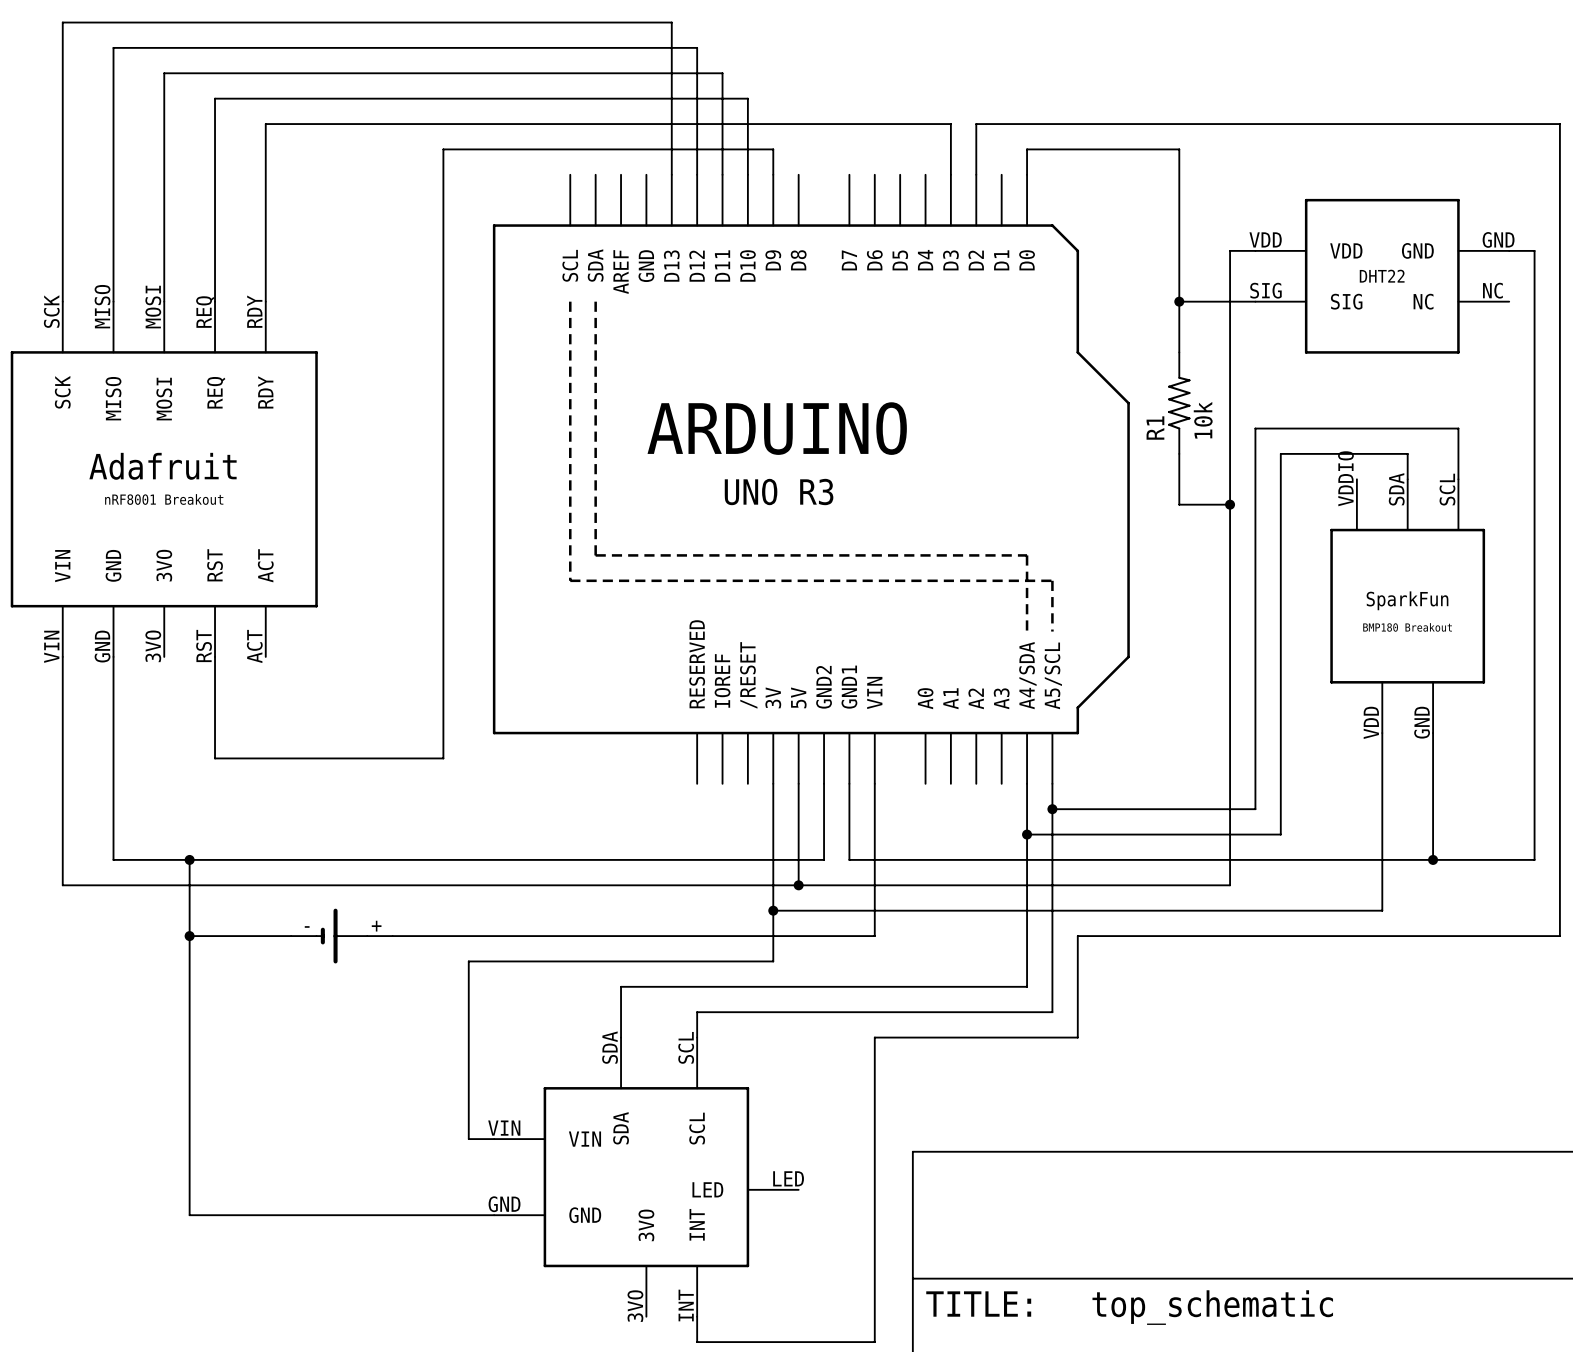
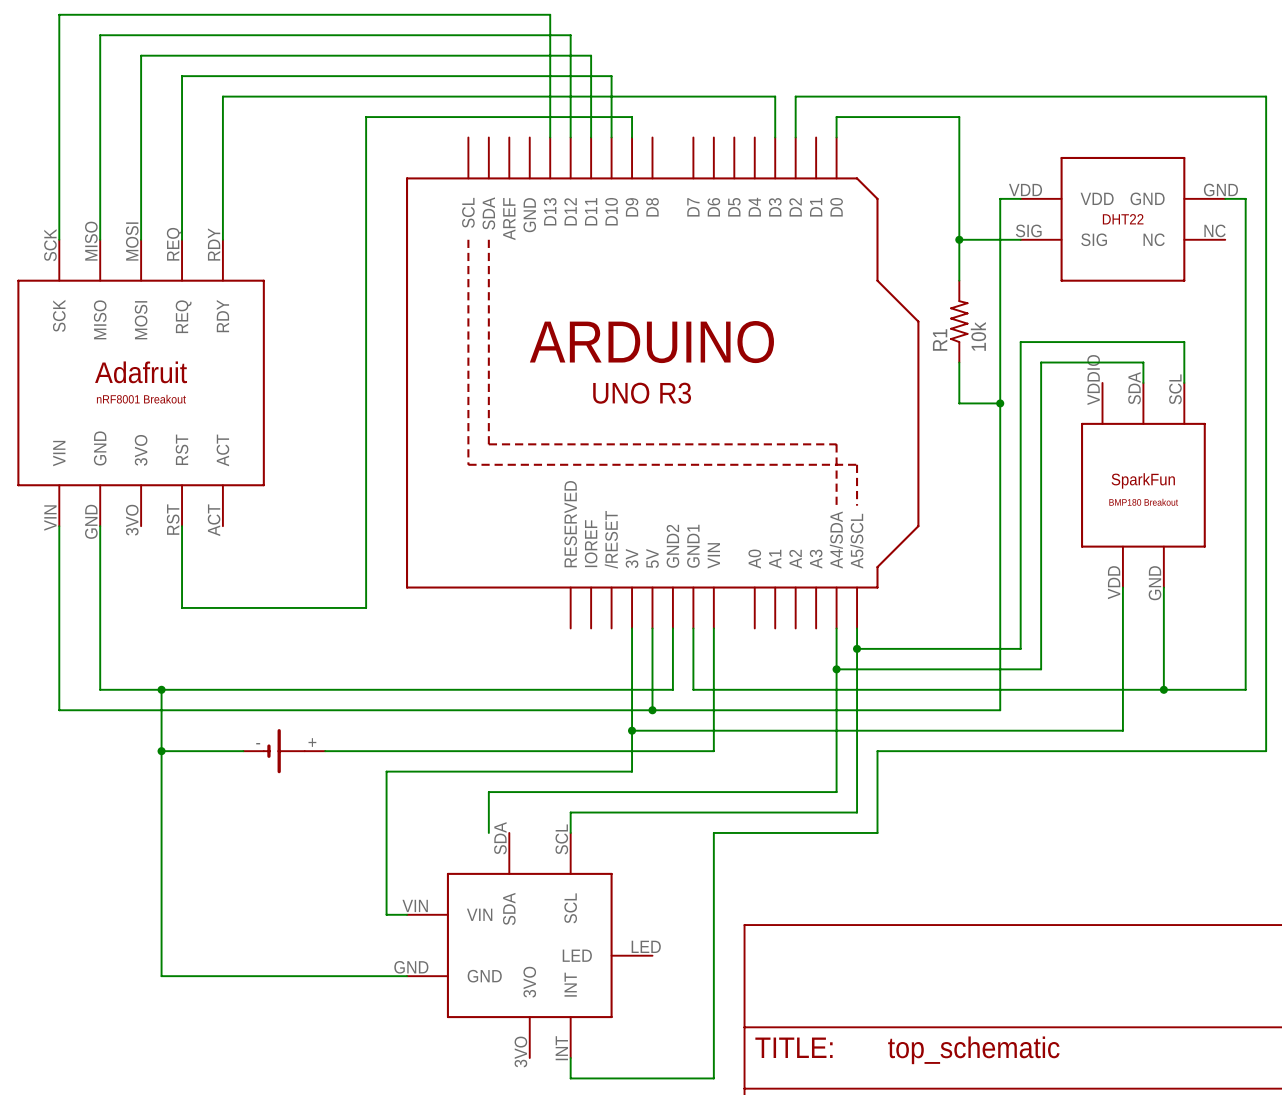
wire: (621, 986) (621, 1037) -> (509, 792) (488, 792) (488, 832)

